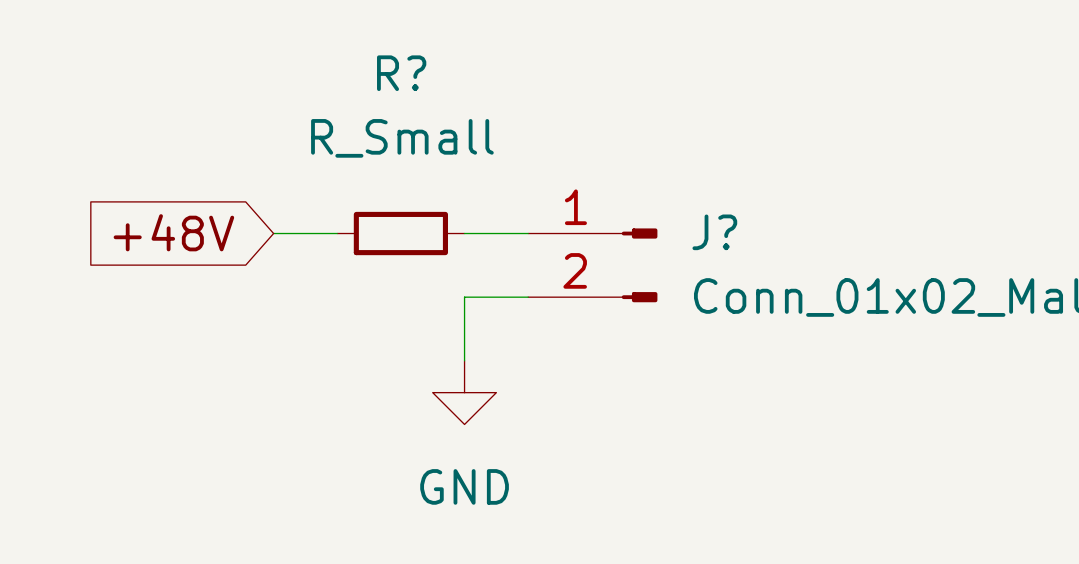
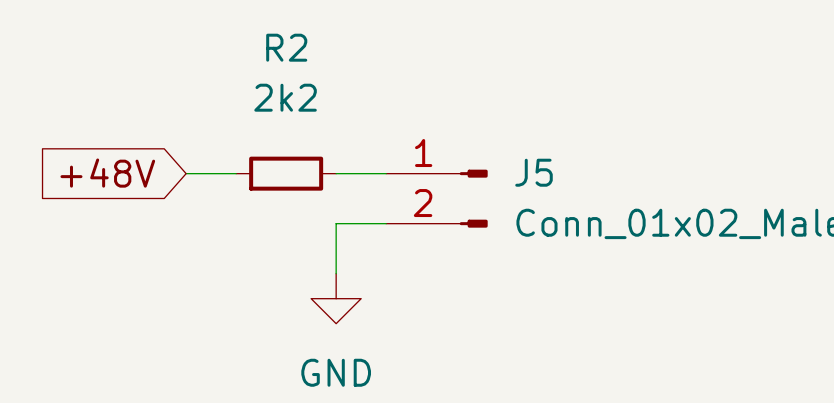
R? name: R? (401, 73) -> R2 (286, 47)
R? value: R_Small (402, 138) -> 2k2 (285, 97)
J? name: J? (714, 232) -> J5 (534, 172)

